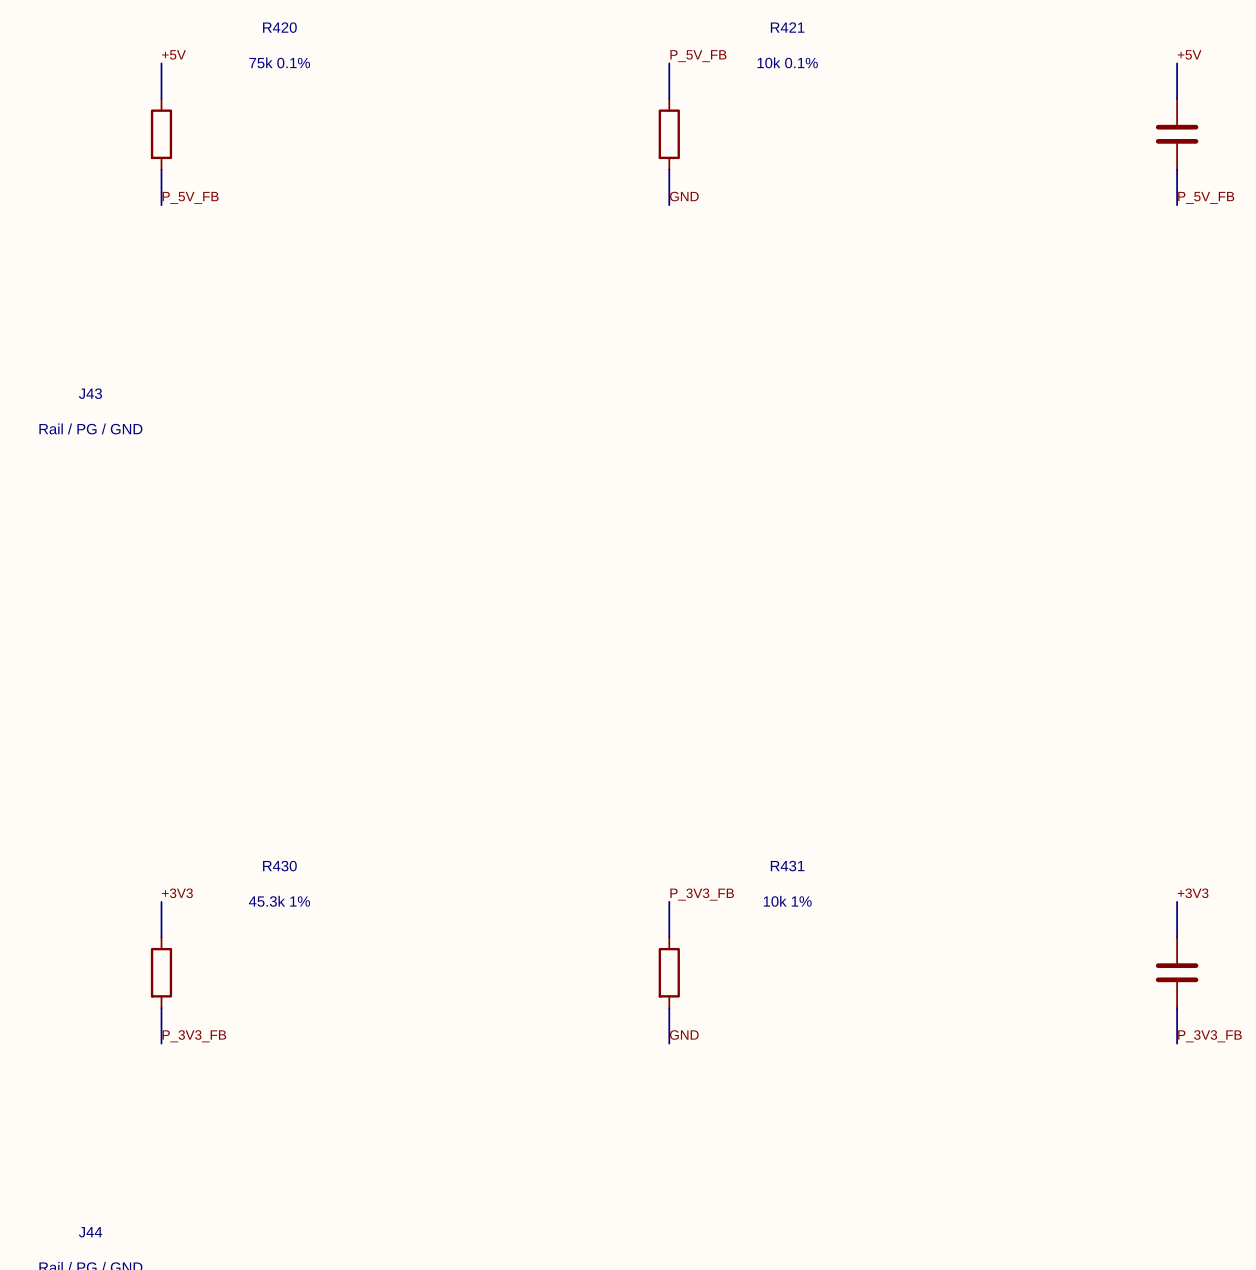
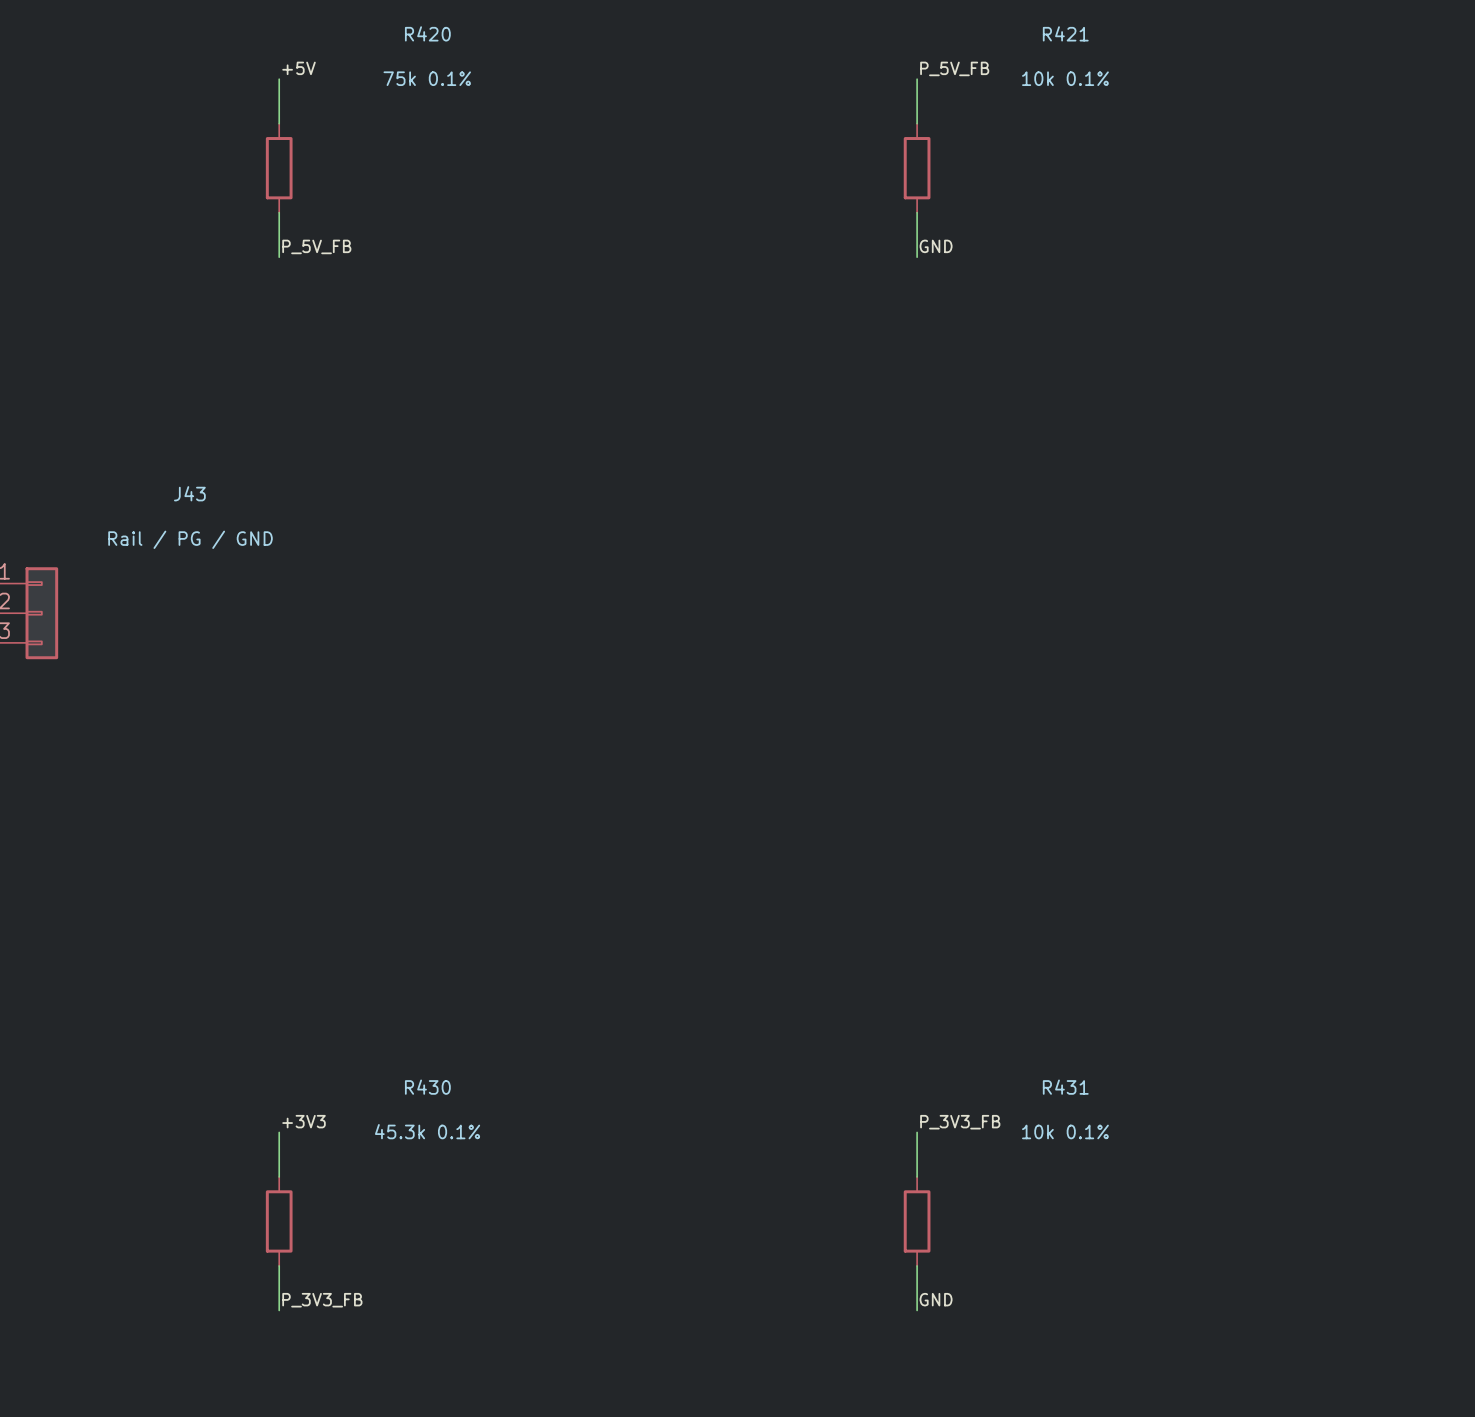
R430 value: 45.3k 1% (279, 901) -> 45.3k 0.1% (427, 1131)
R431 value: 10k 1% (787, 901) -> 10k 0.1% (1065, 1131)

